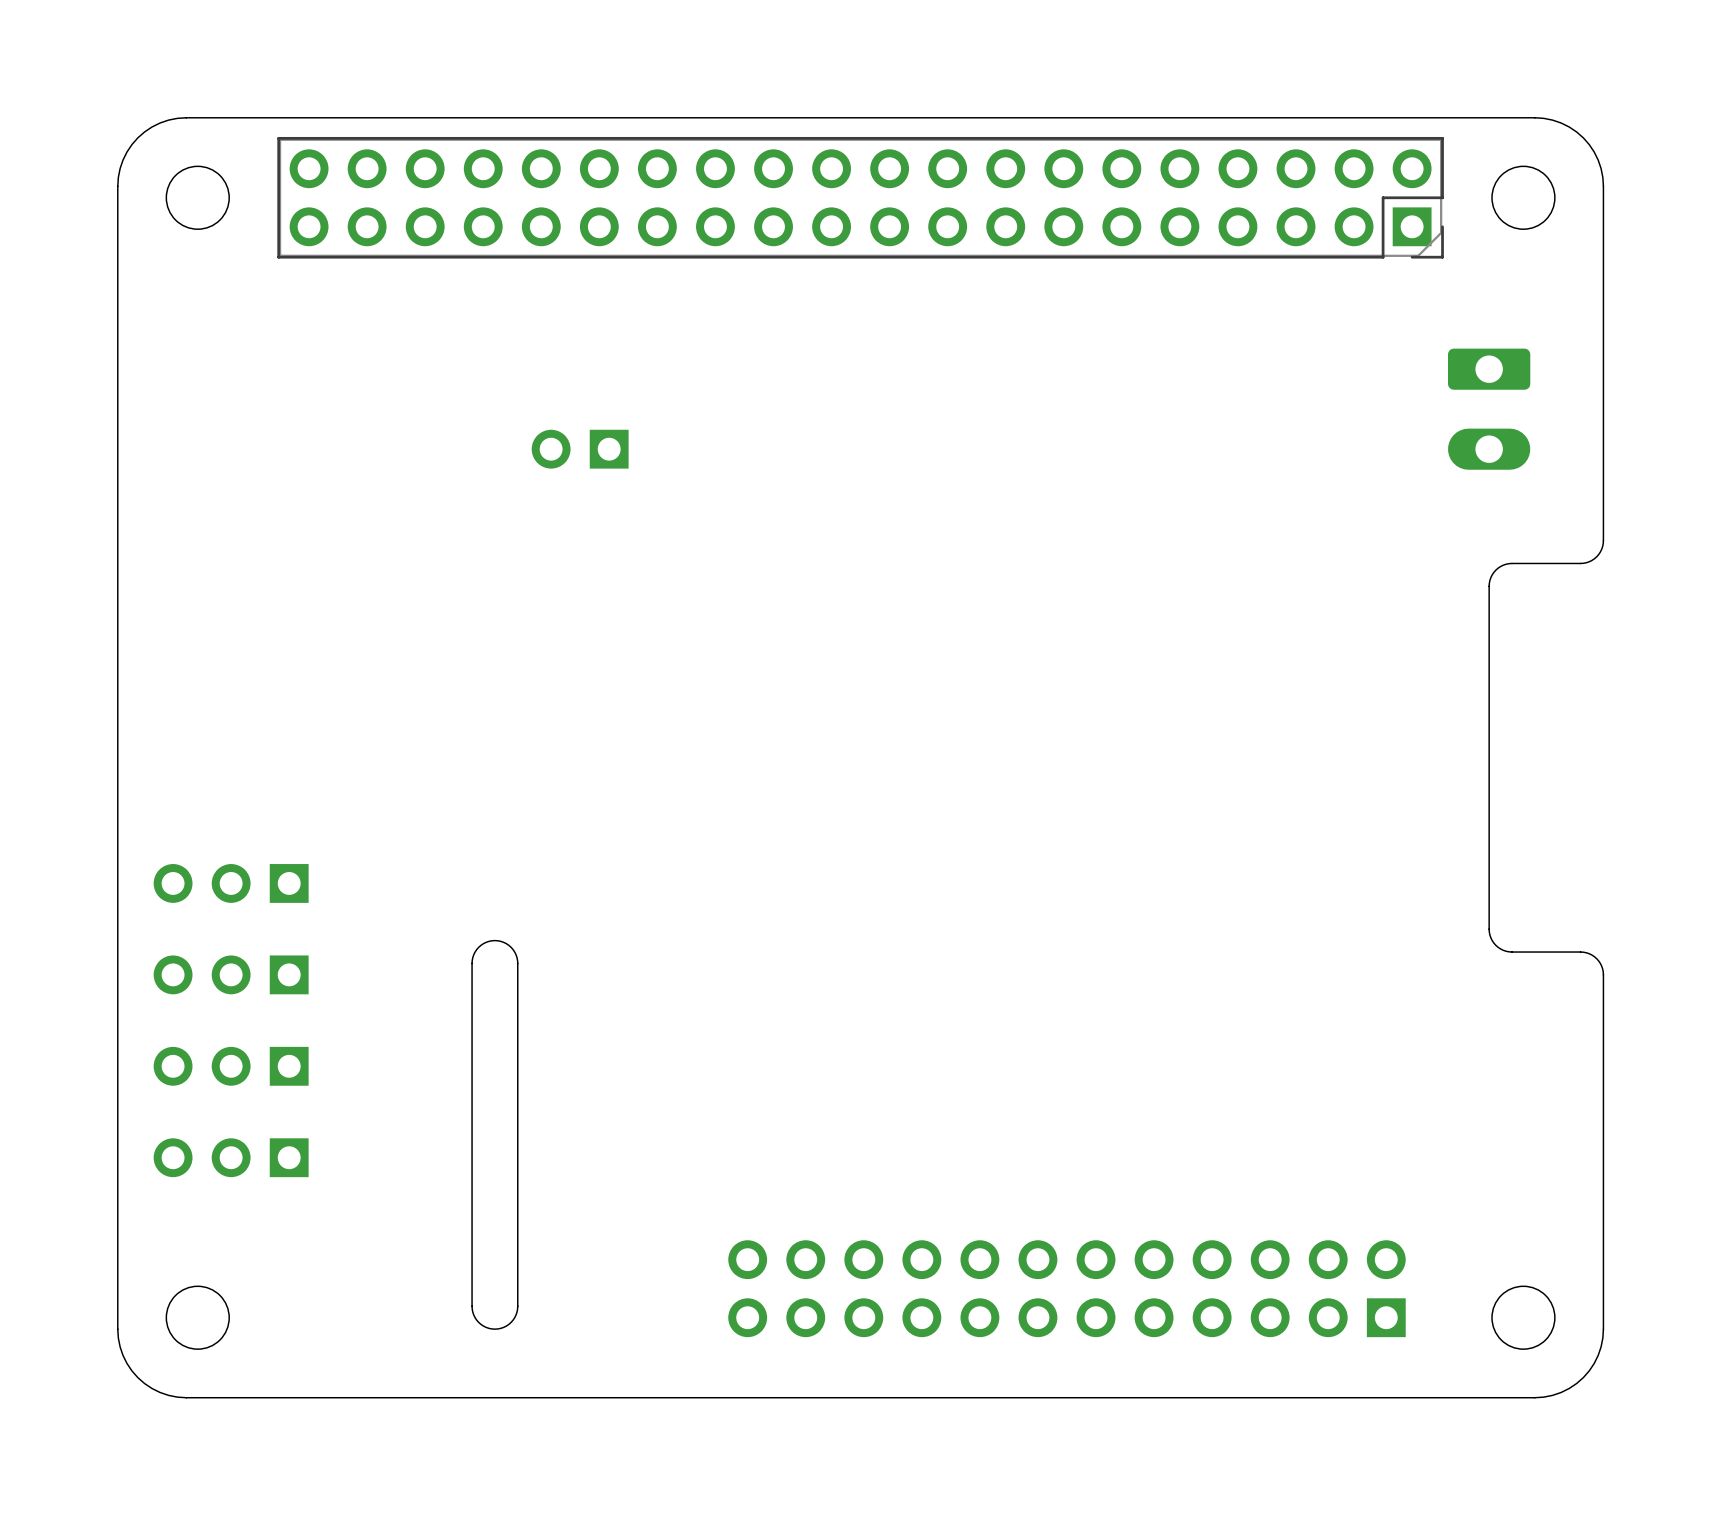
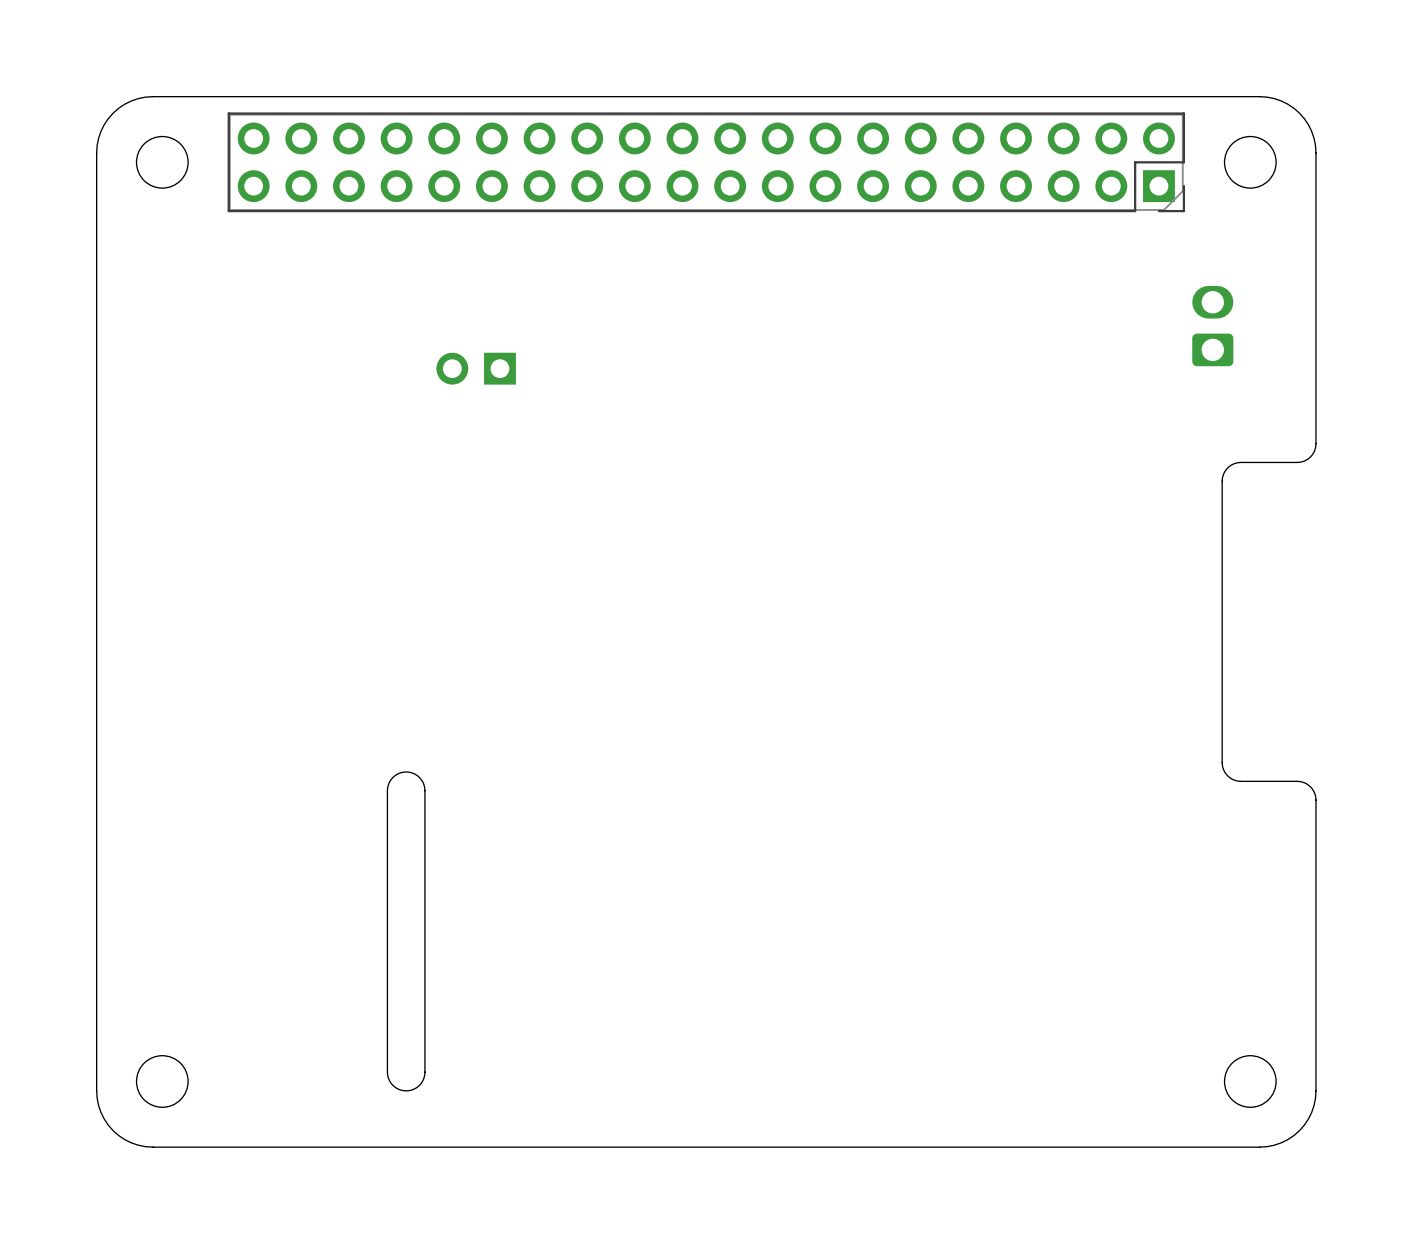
part footprint: [1448, 348, 1531, 470] -> [1192, 285, 1234, 367]
part: (231, 883) -> none
part: (231, 974) -> none
part: (231, 1066) -> none
part: (231, 1157) -> none
part: (1066, 1288) -> none

